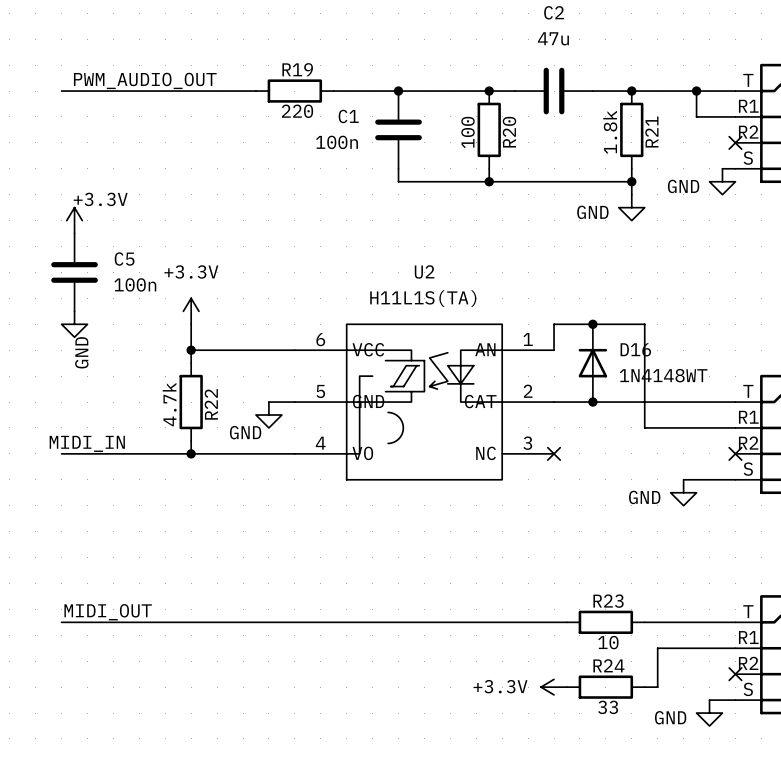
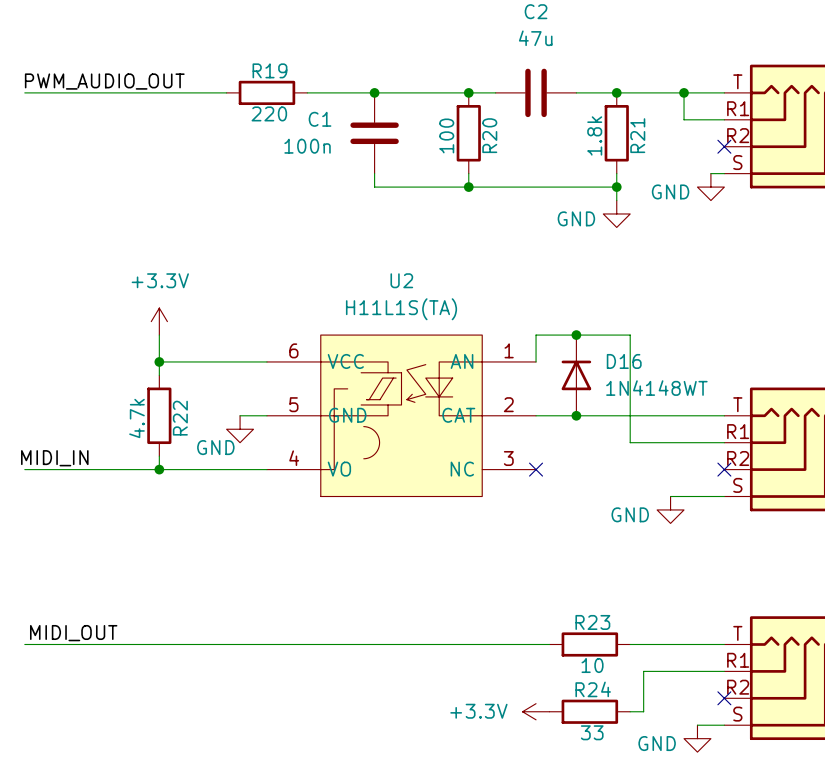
power symbol: +3.3V (74, 220) -> none
C5: 100n (74, 272) -> none
power symbol: GND (74, 324) -> none

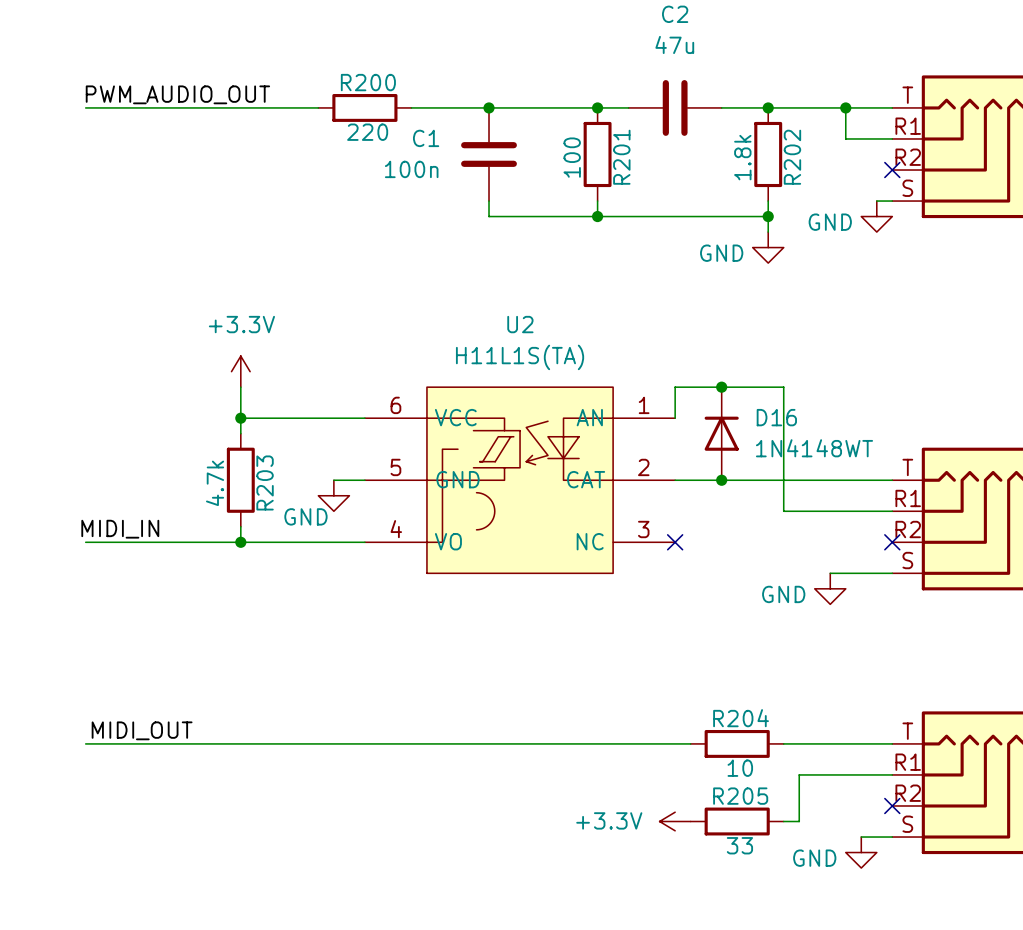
R19 name: R19 (269, 70) -> R200 (368, 82)
R20 name: R20 (489, 135) -> R201 (621, 157)
R21 name: R21 (637, 135) -> R202 (792, 157)
R22 name: R22 (180, 418) -> R203 (265, 482)
R23 name: R23 (592, 622) -> R204 (741, 718)
R24 name: R24 (593, 689) -> R205 (740, 796)

